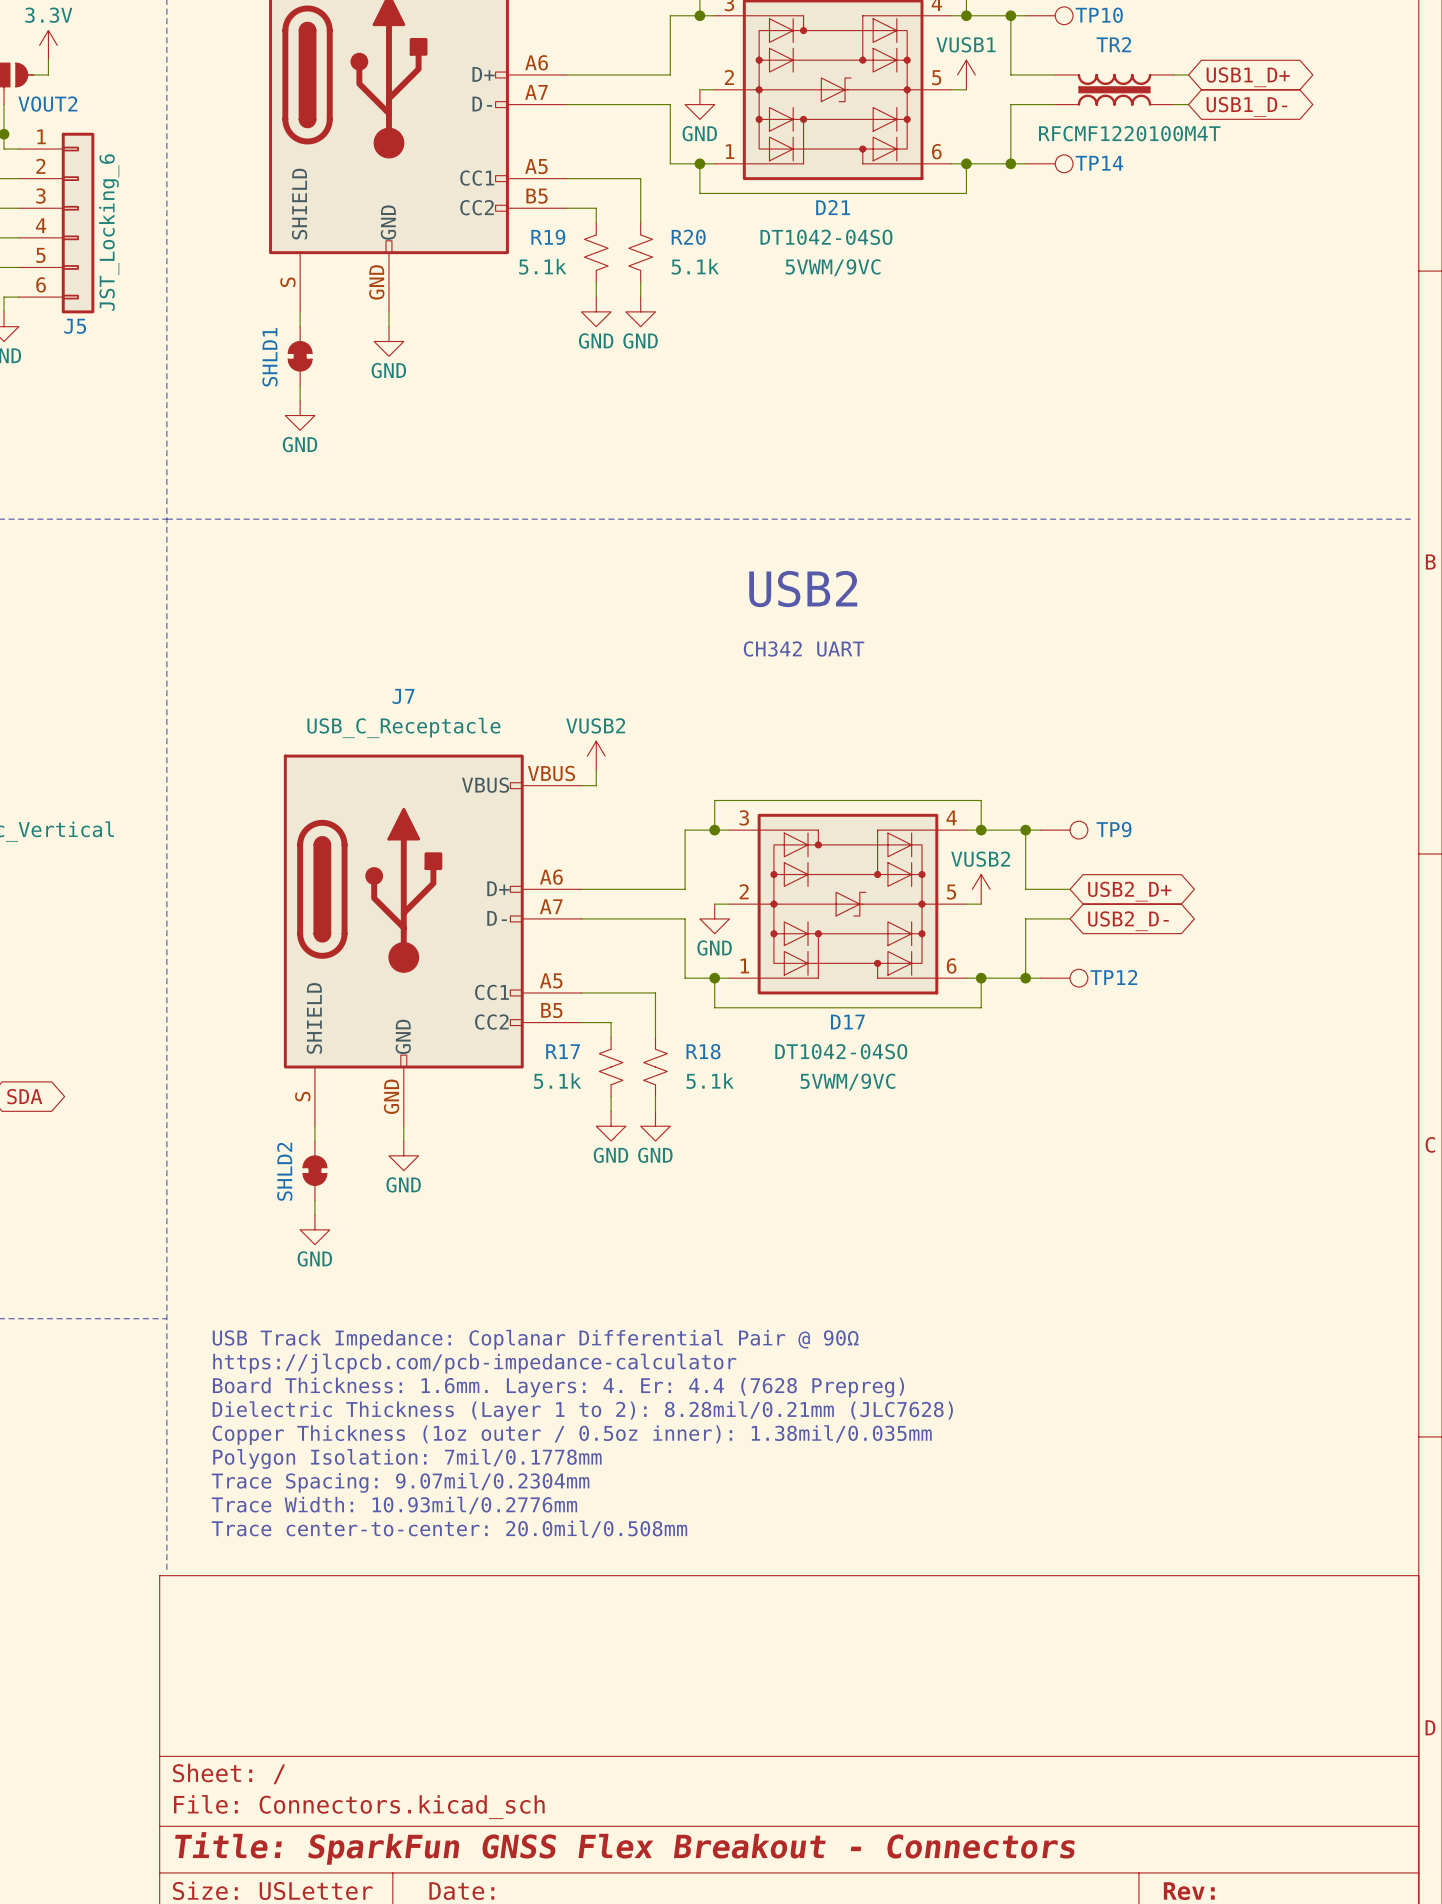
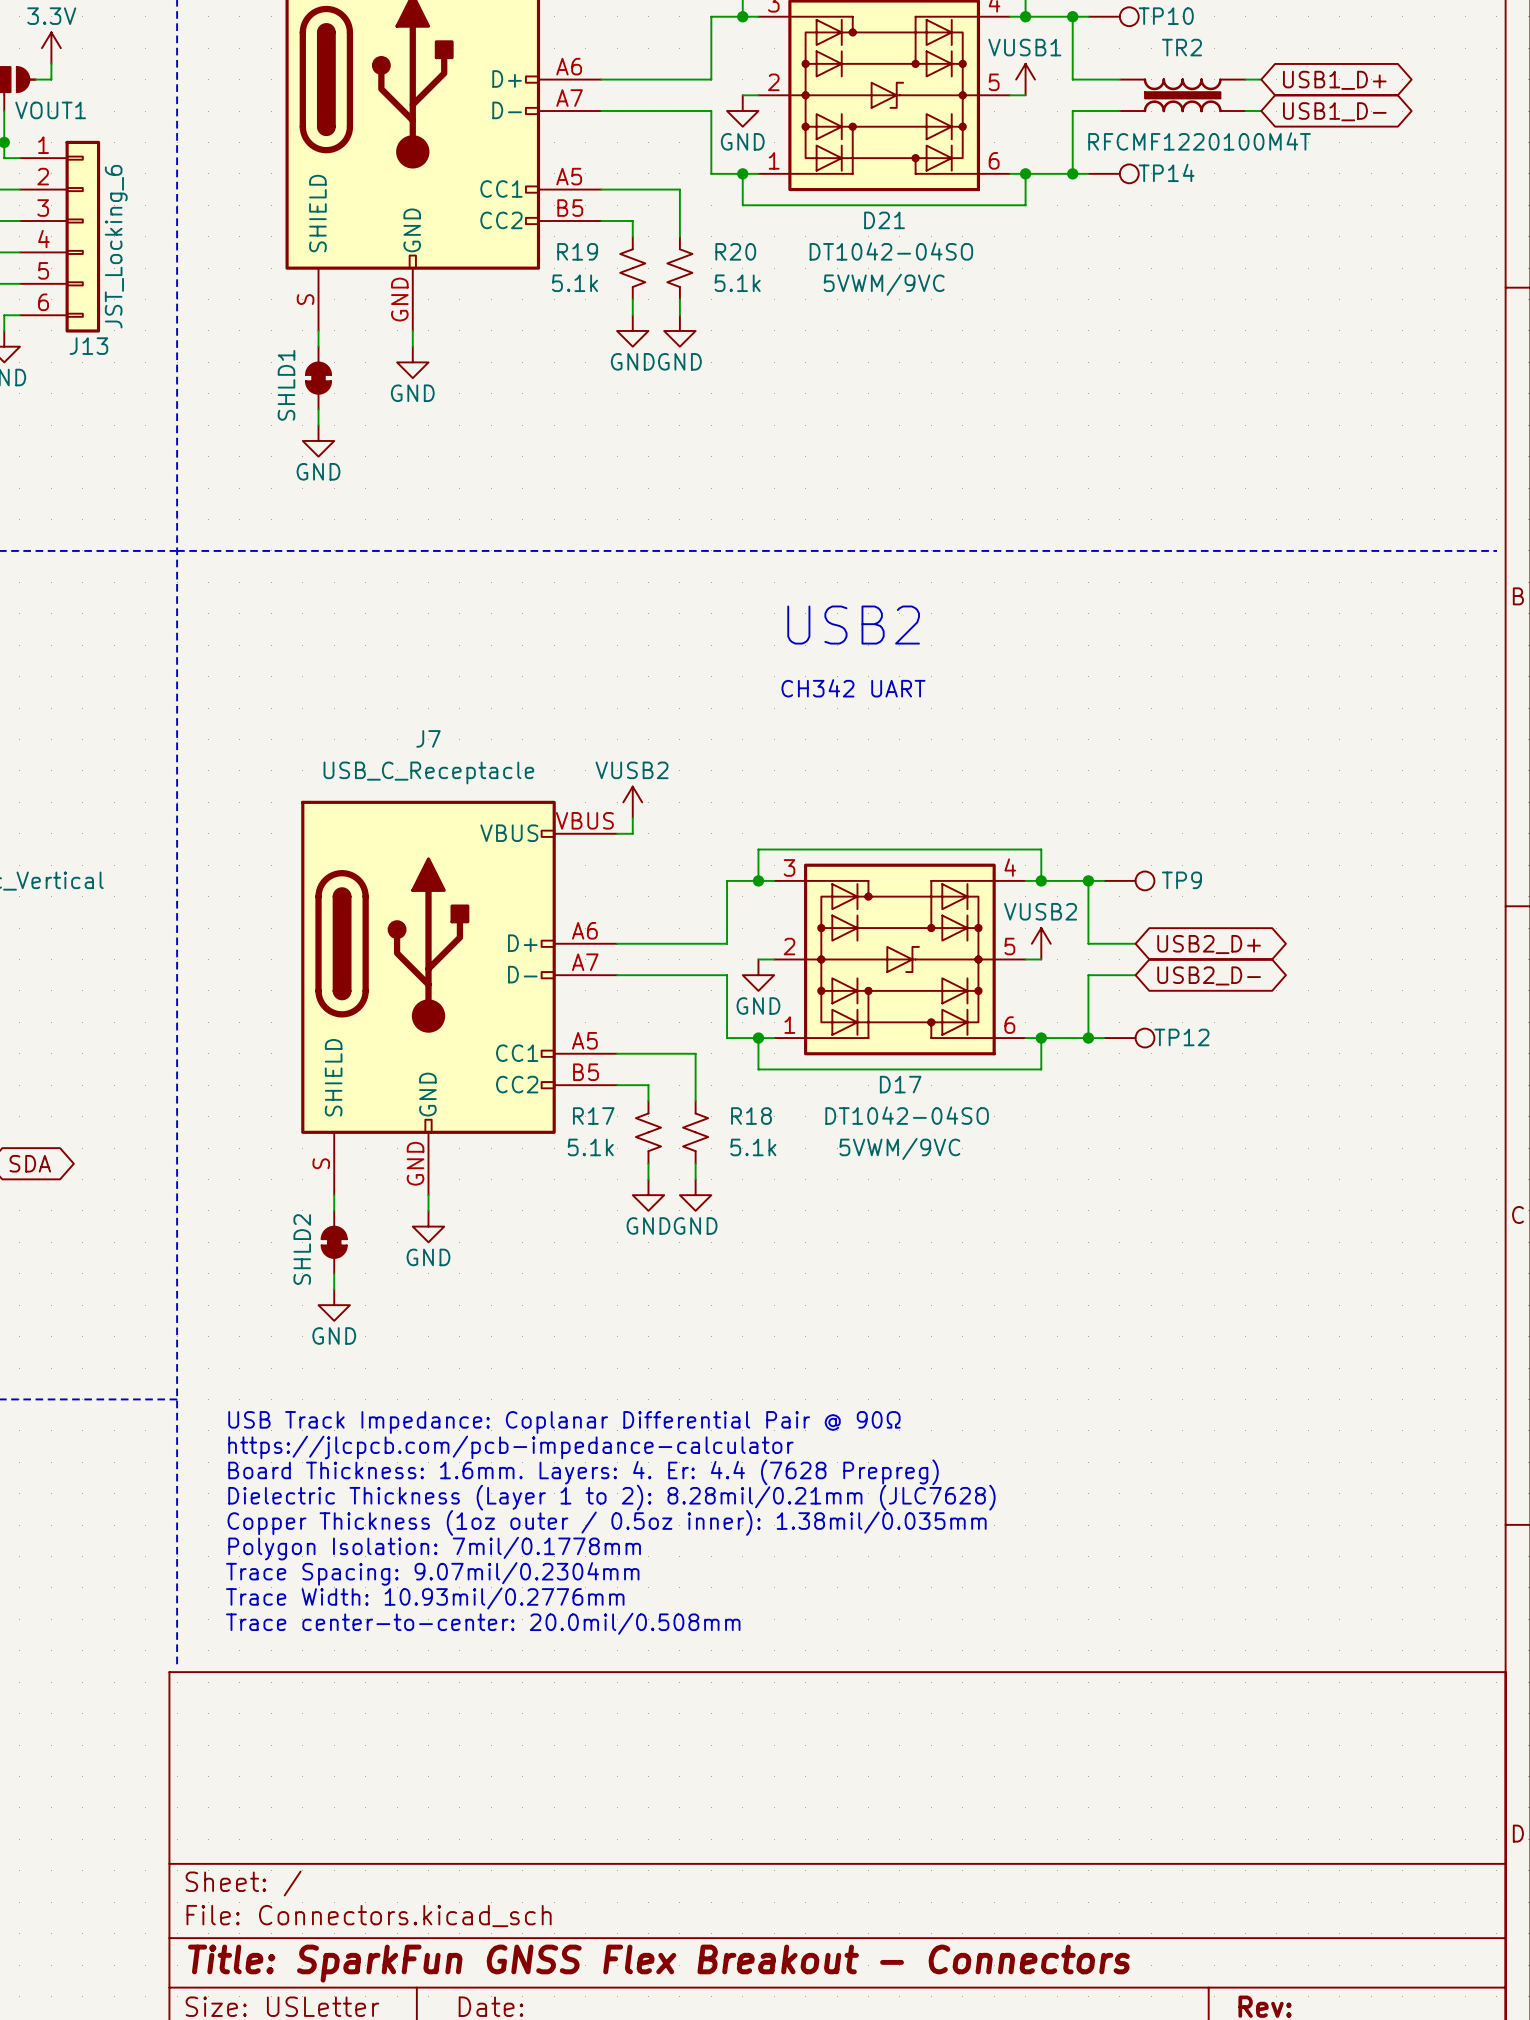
VOUT2 name: VOUT2 (47, 104) -> VOUT1 (50, 110)
J5 name: J5 (75, 326) -> J13 (88, 346)

